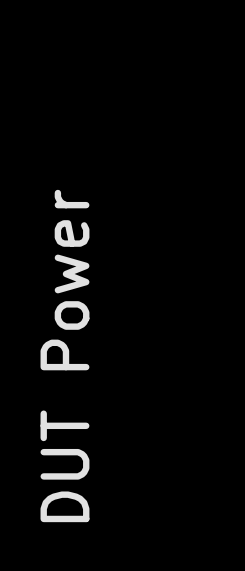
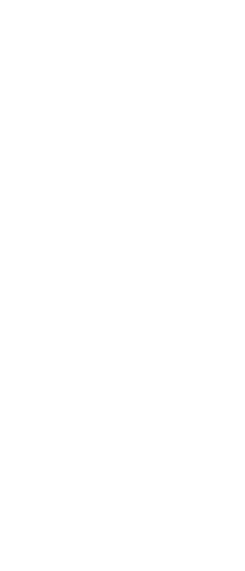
text: DUT Power (64, 355) -> none

